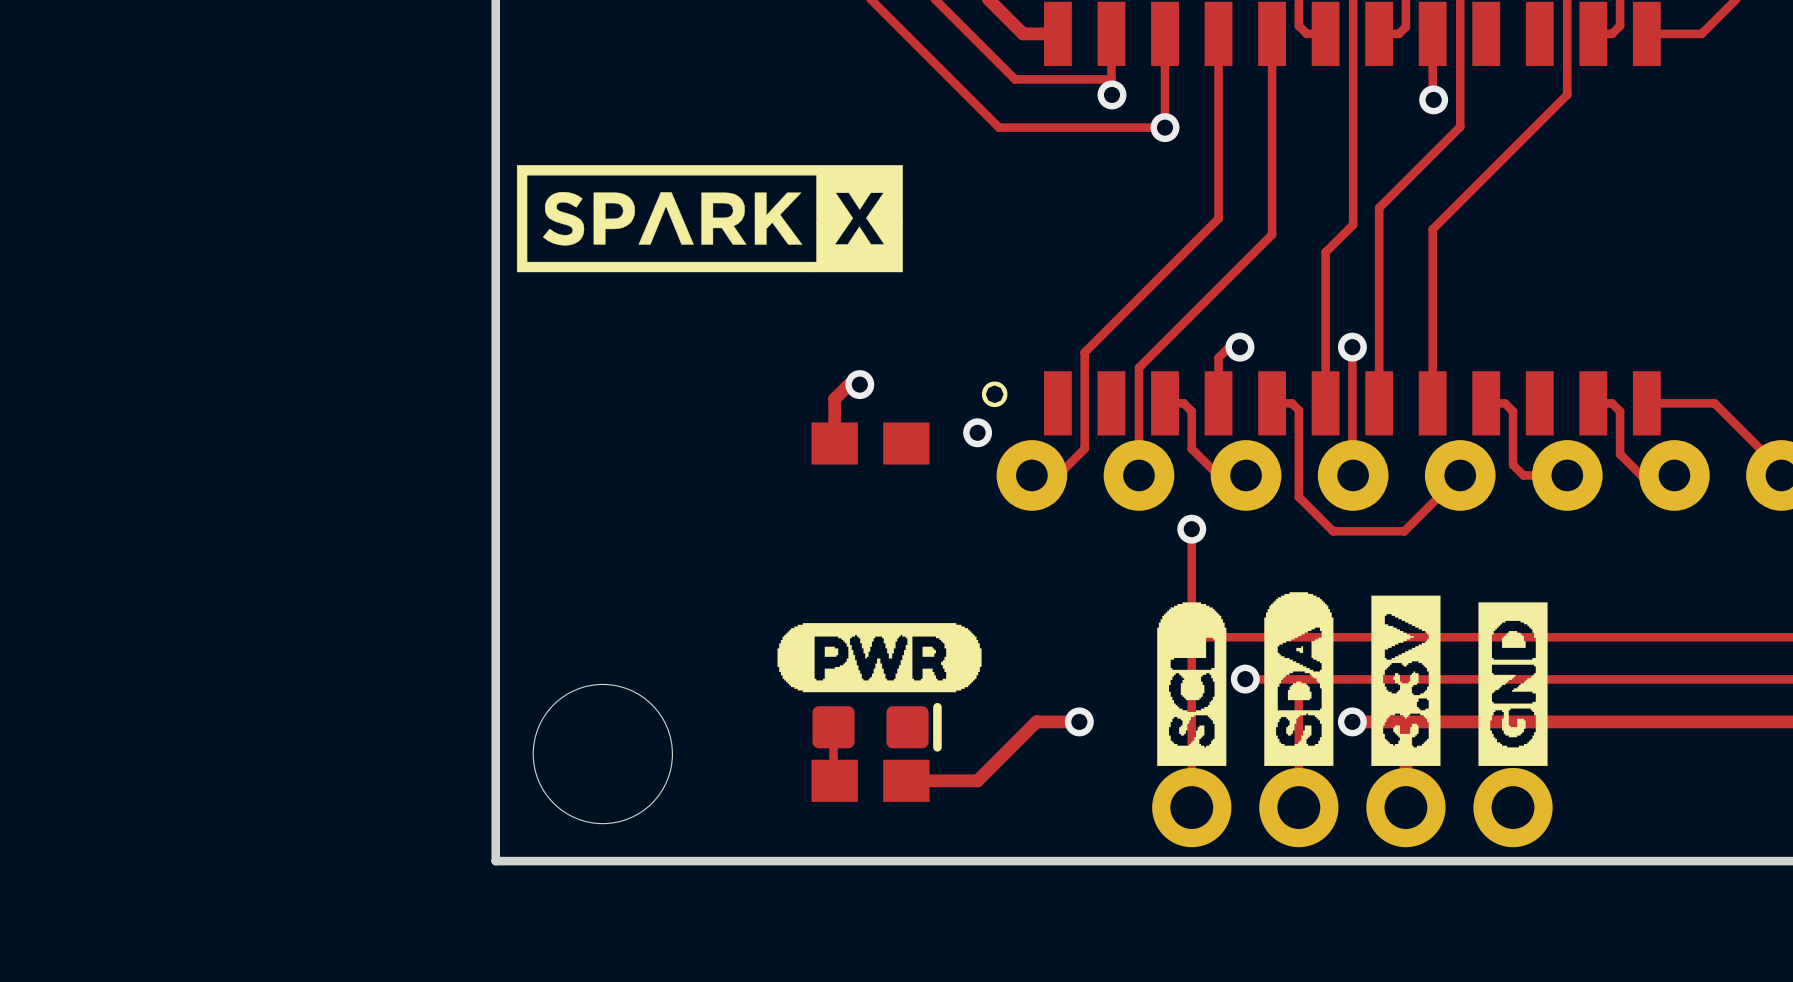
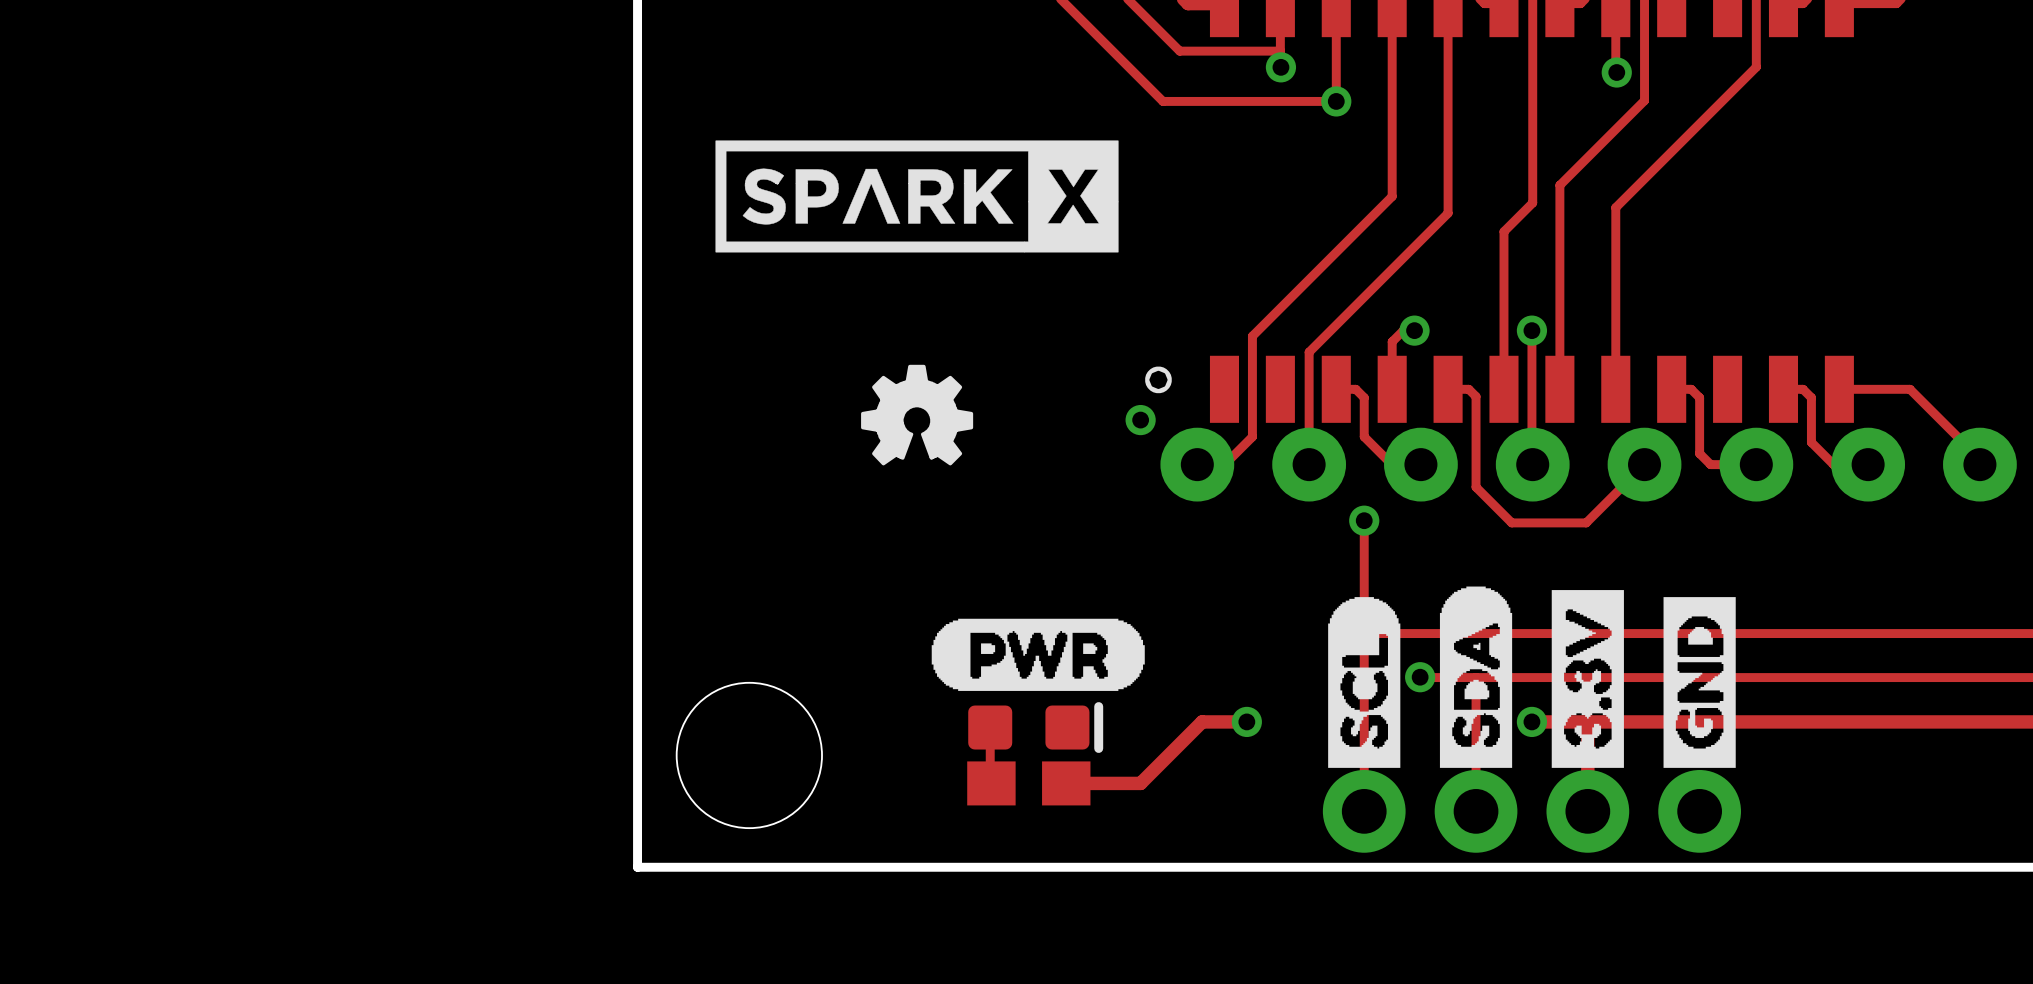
drawing position: (709, 218) -> (917, 196)
drawing: none -> [861, 364, 974, 466]
track: (859, 384) (849, 384) (834, 399) (834, 443) -> none
via: (859, 384) -> none
part: (870, 443) -> none

